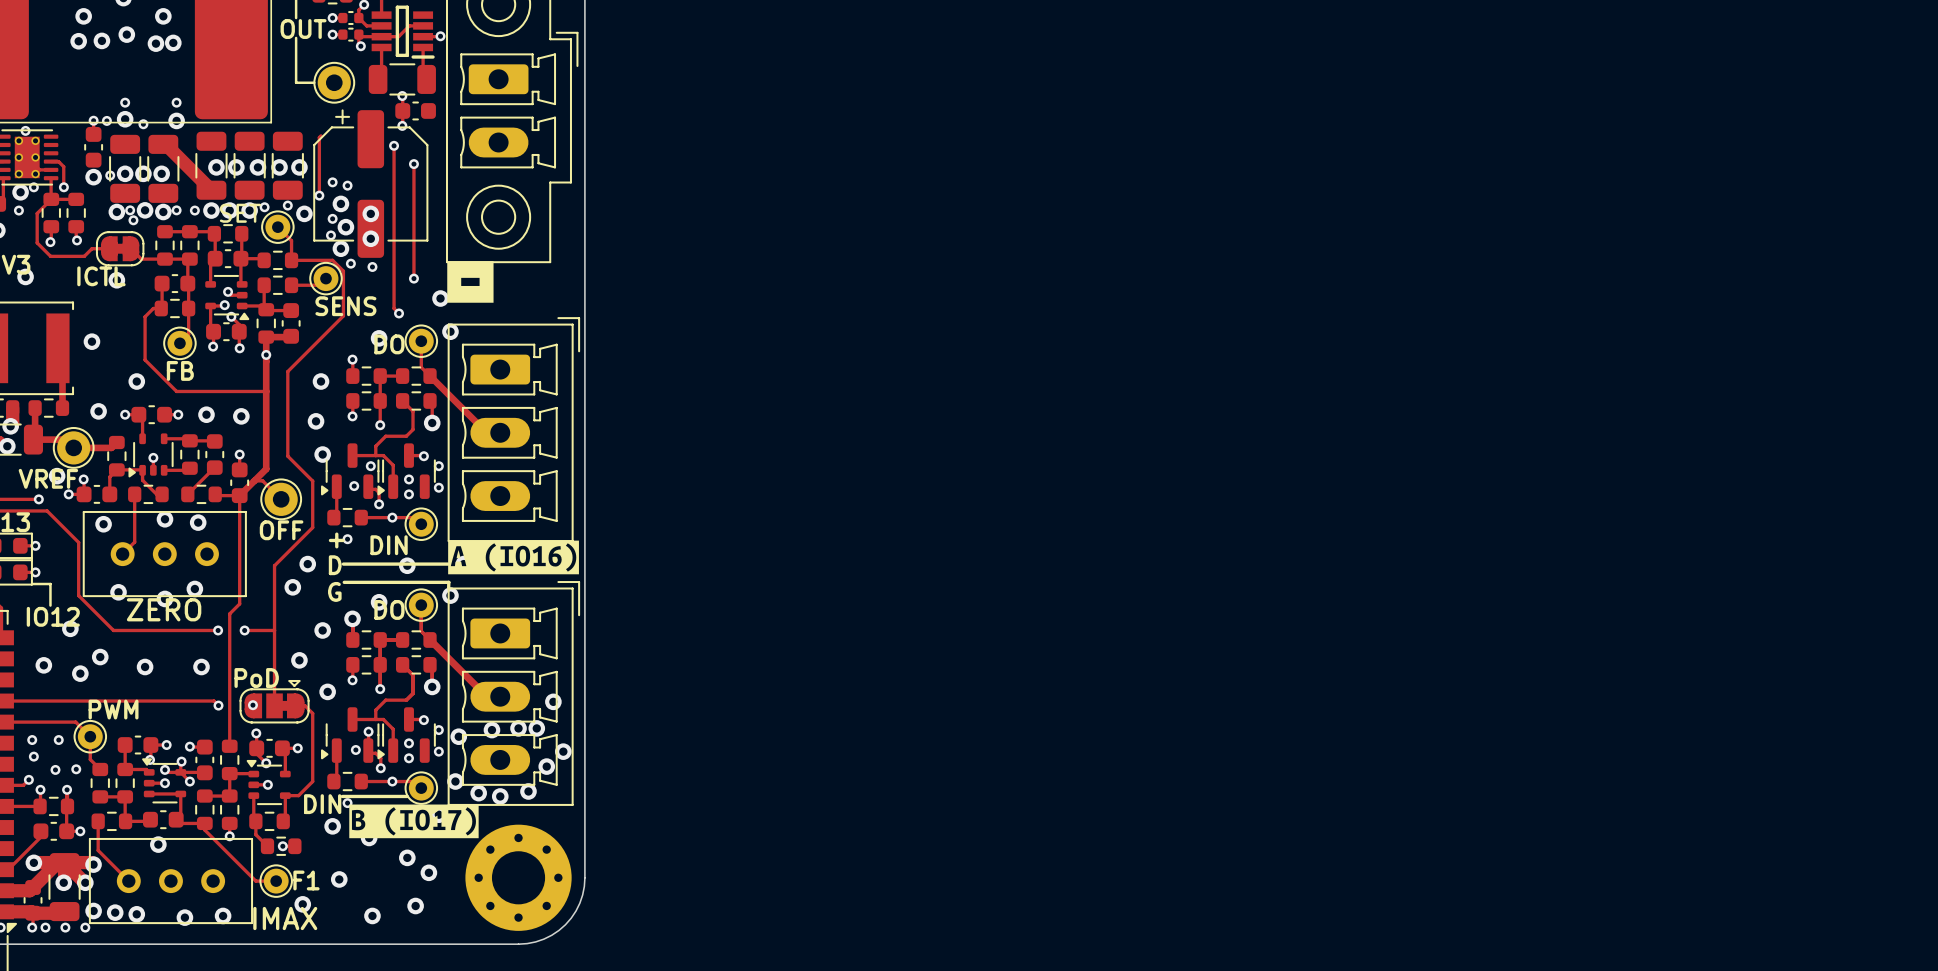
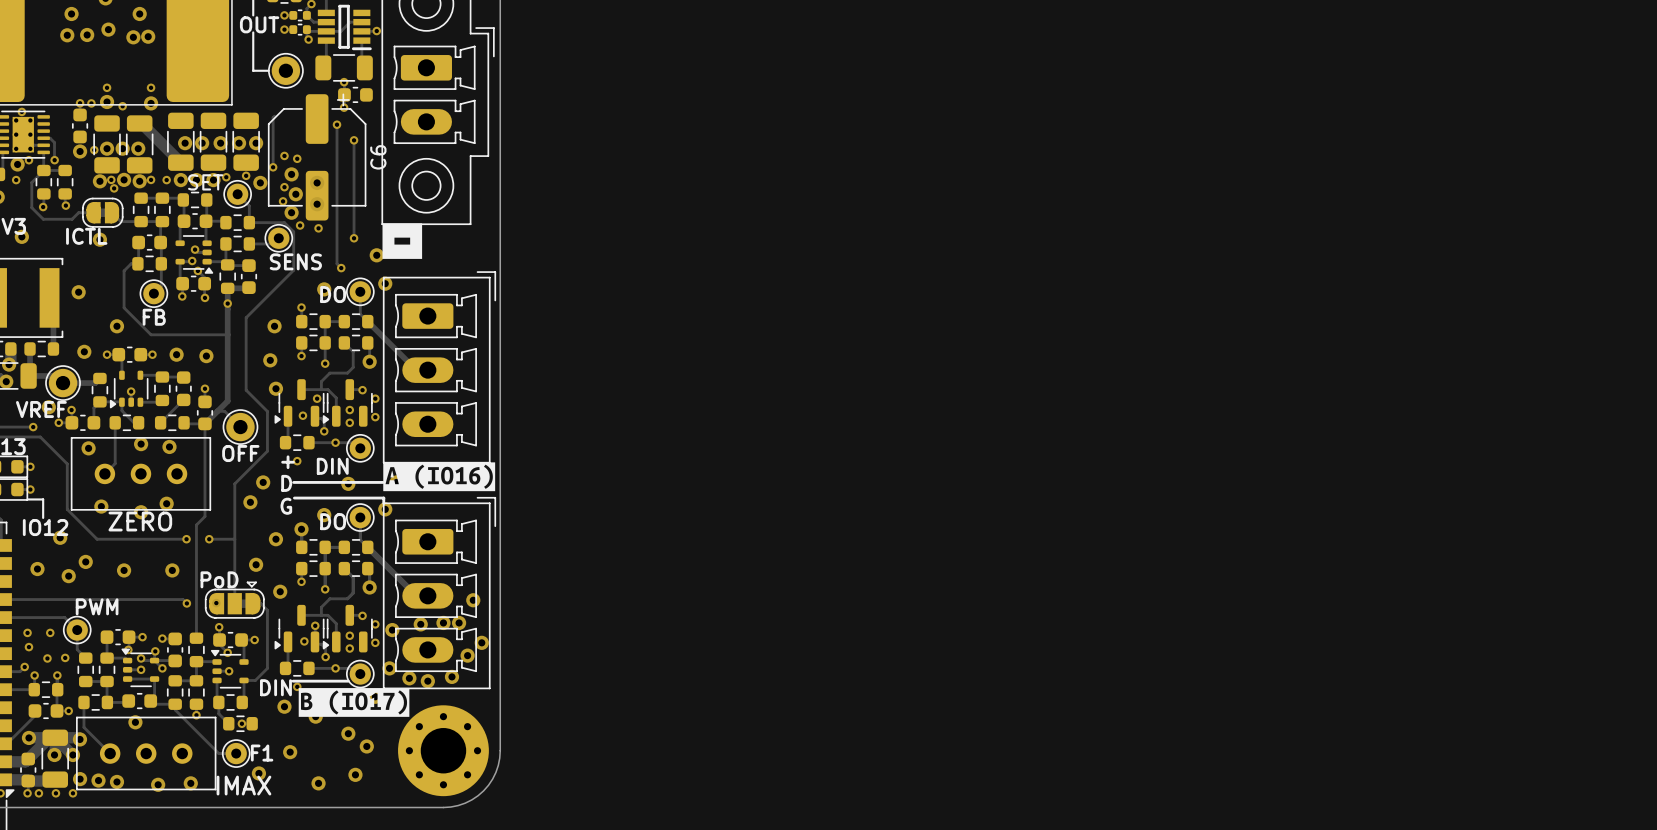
part: (370, 183) -> none
C6: none -> (317, 157)

